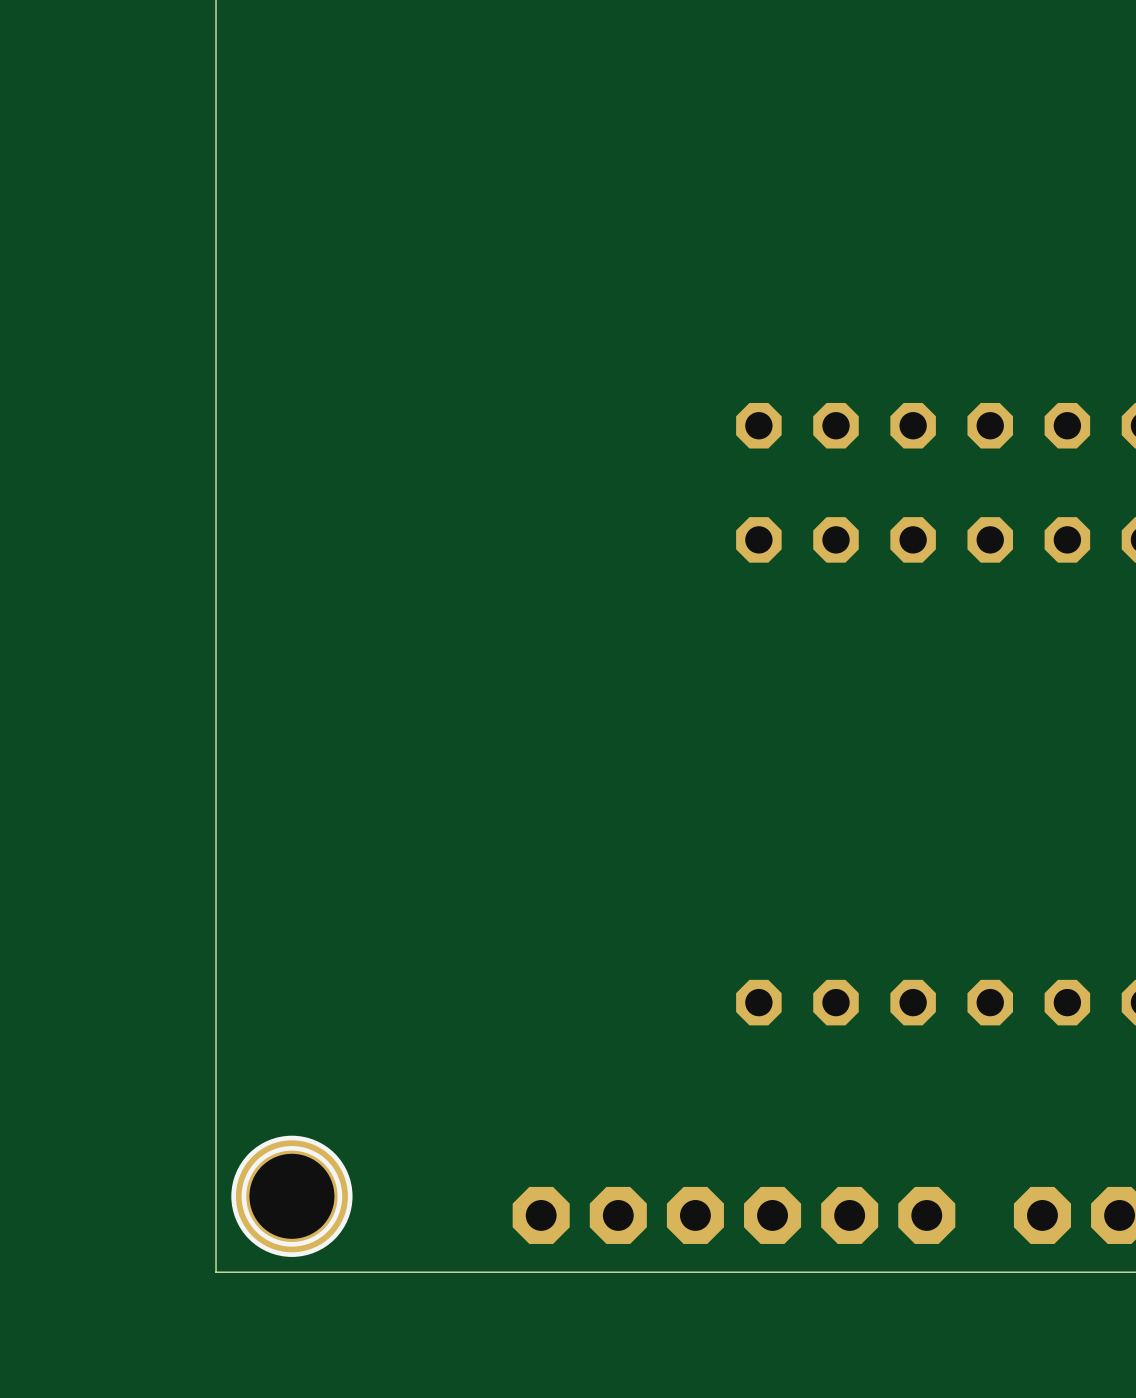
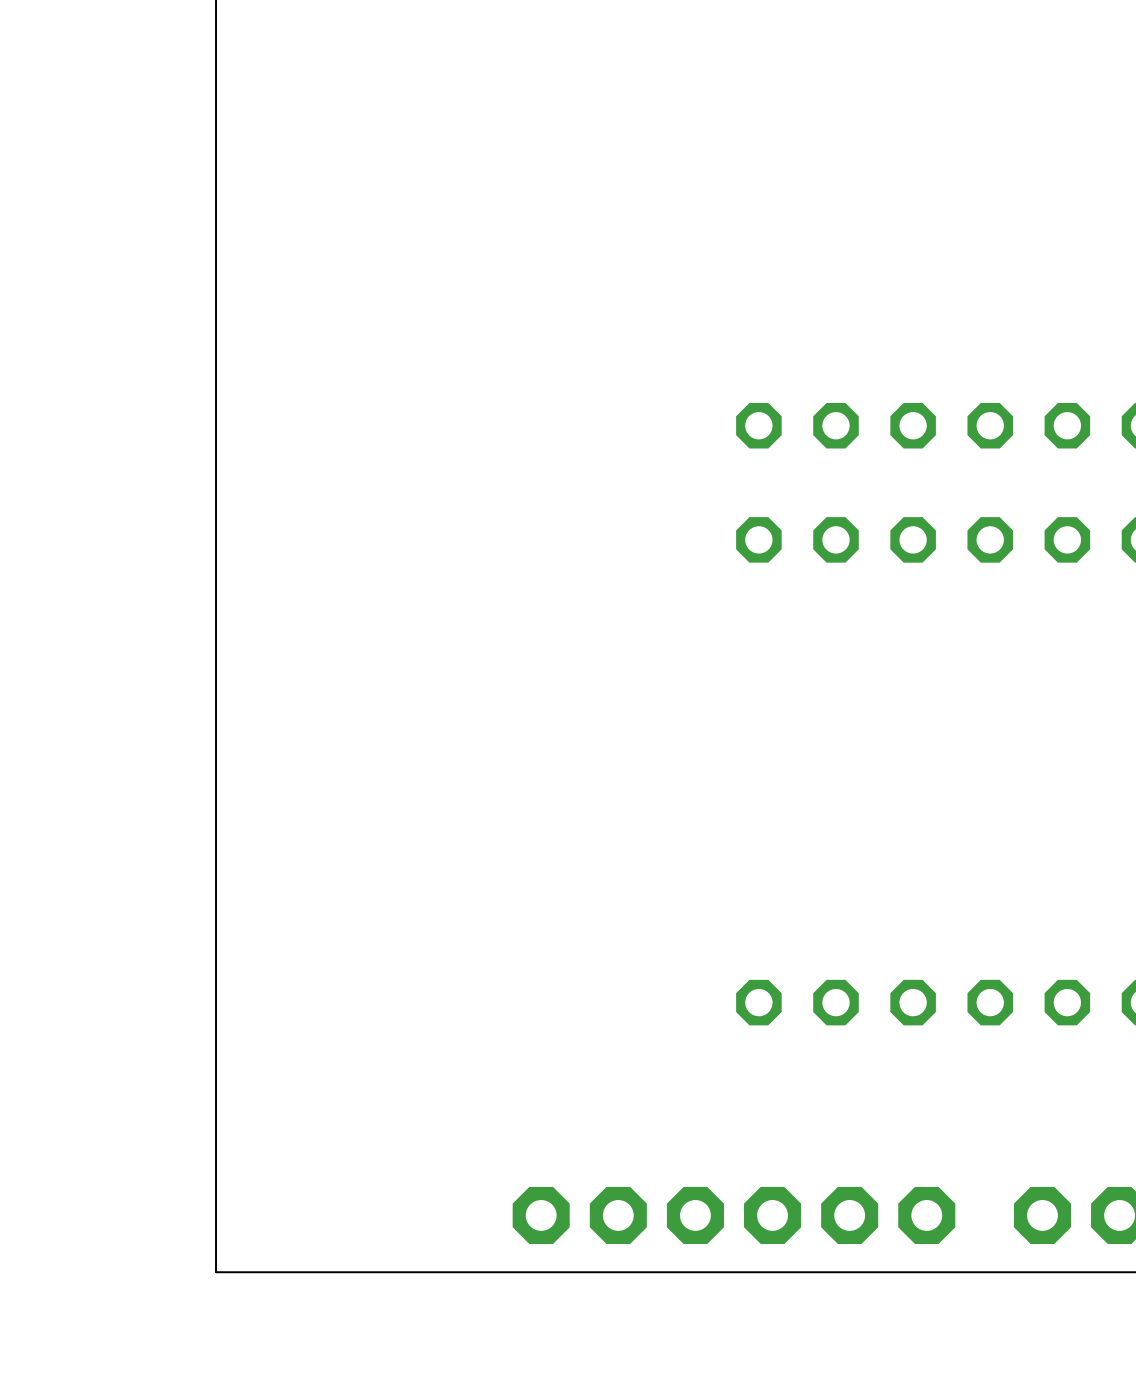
part: (291, 1196) -> none

